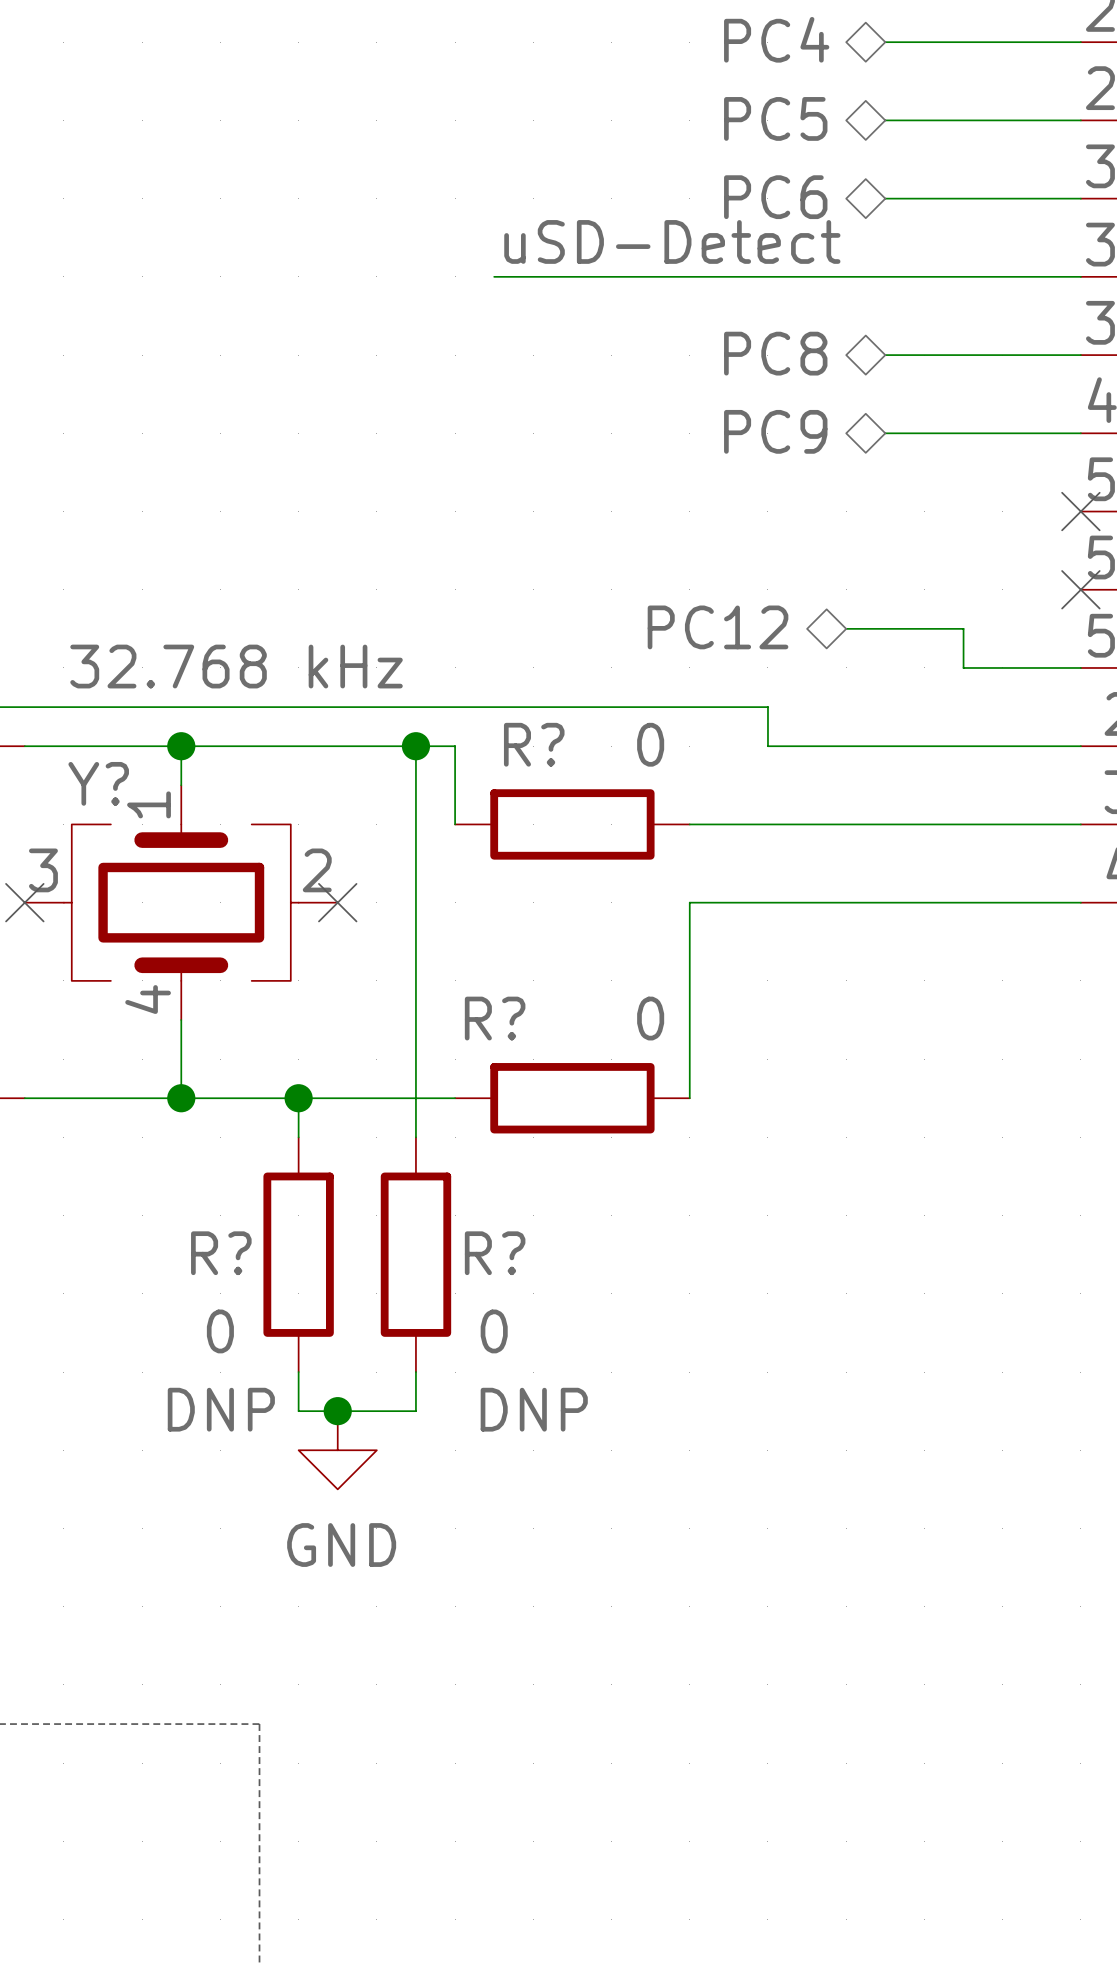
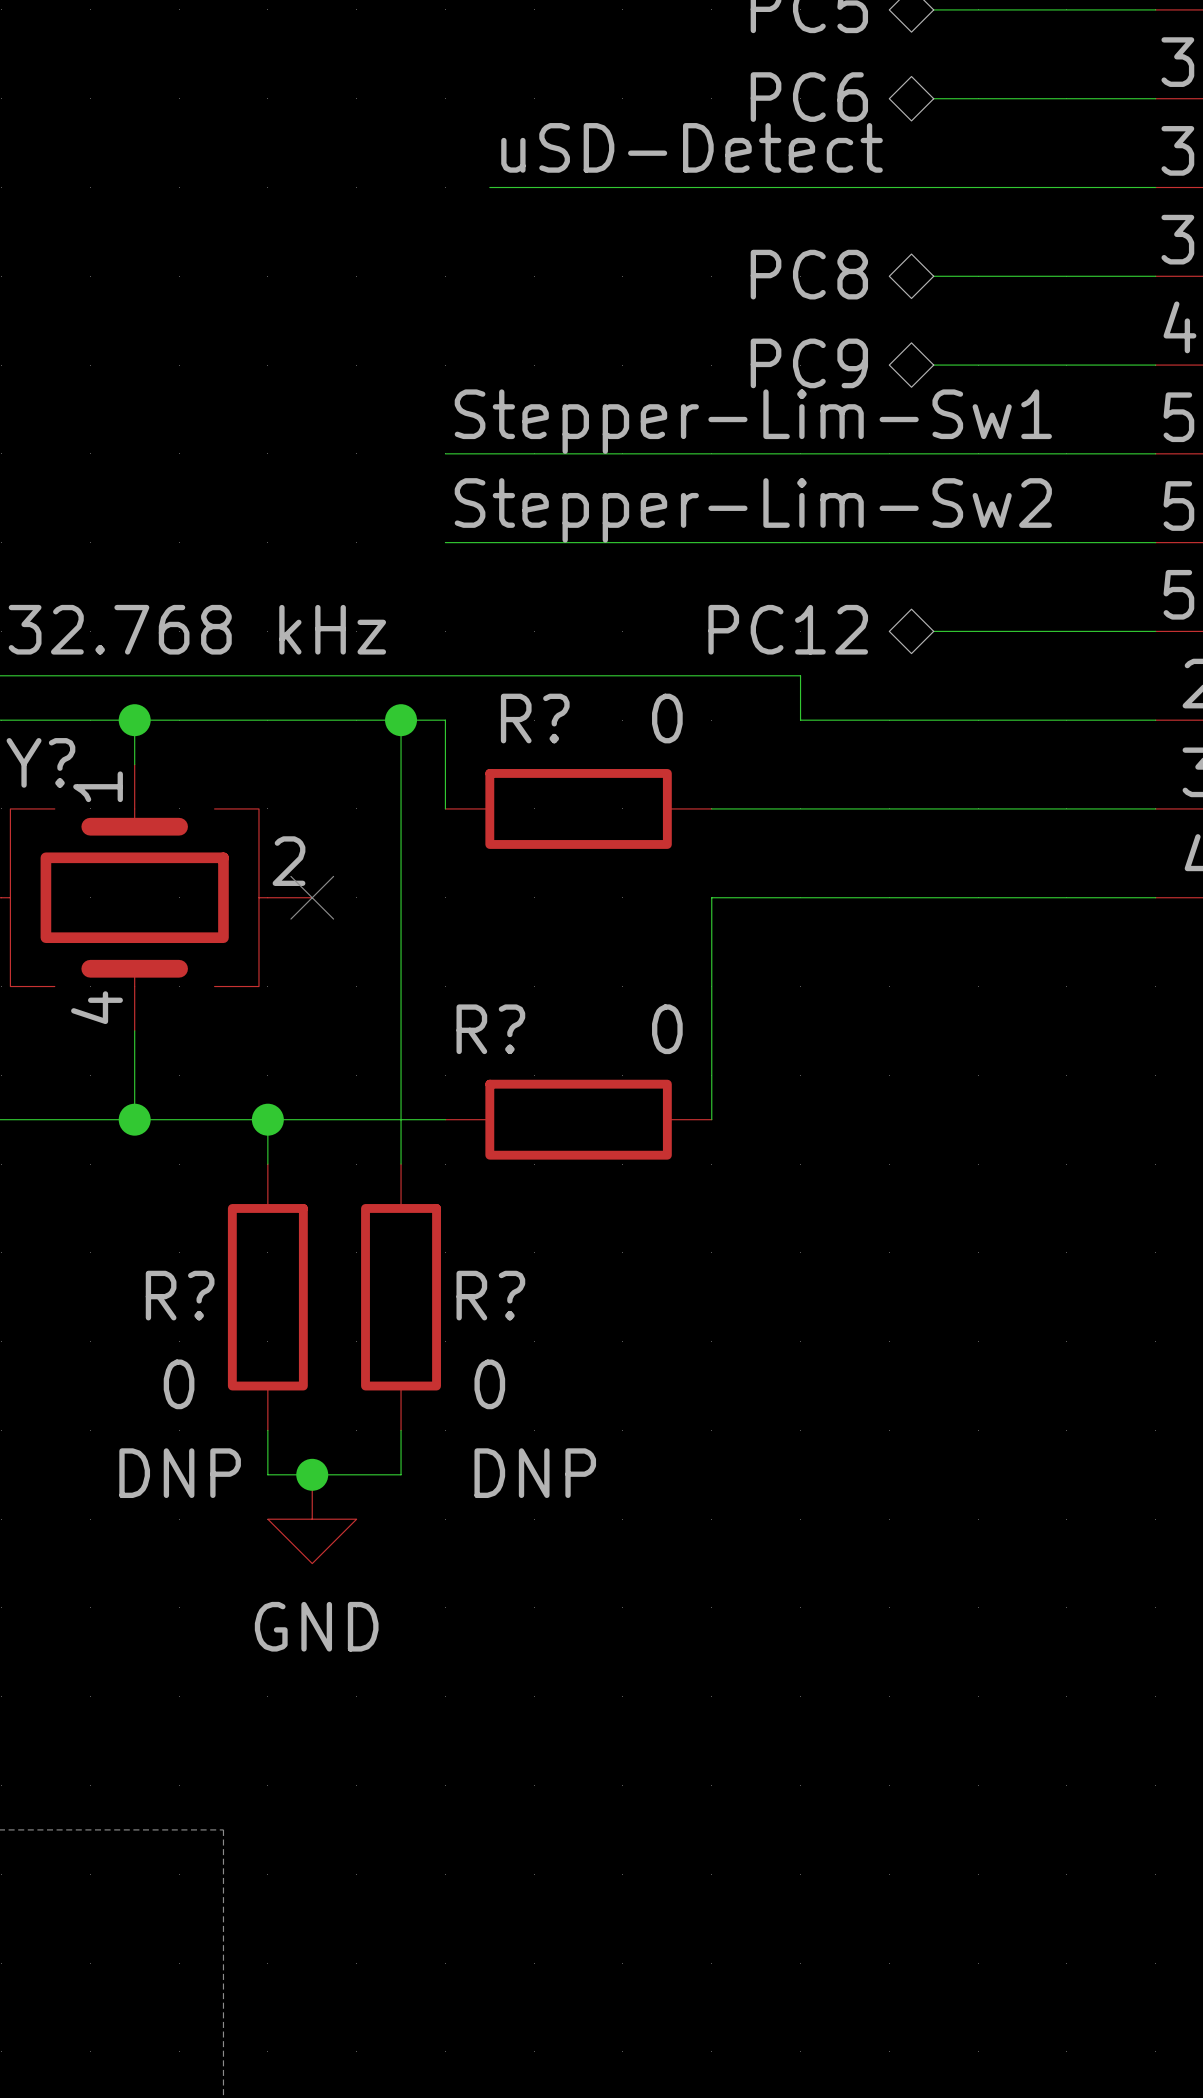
label: none -> Stepper-Lim-Sw1 (753, 421)
wire: none -> (445, 453) (1155, 453)
no-connect mark: (1080, 511) -> none
label: none -> Stepper-Lim-Sw2 (753, 510)
wire: none -> (445, 542) (1155, 542)
no-connect mark: (1080, 589) -> none
hierarchical label position: PC12 (718, 627) -> PC12 (788, 629)
wire: (846, 628) (963, 628) (963, 667) -> (933, 631) (1022, 631)

